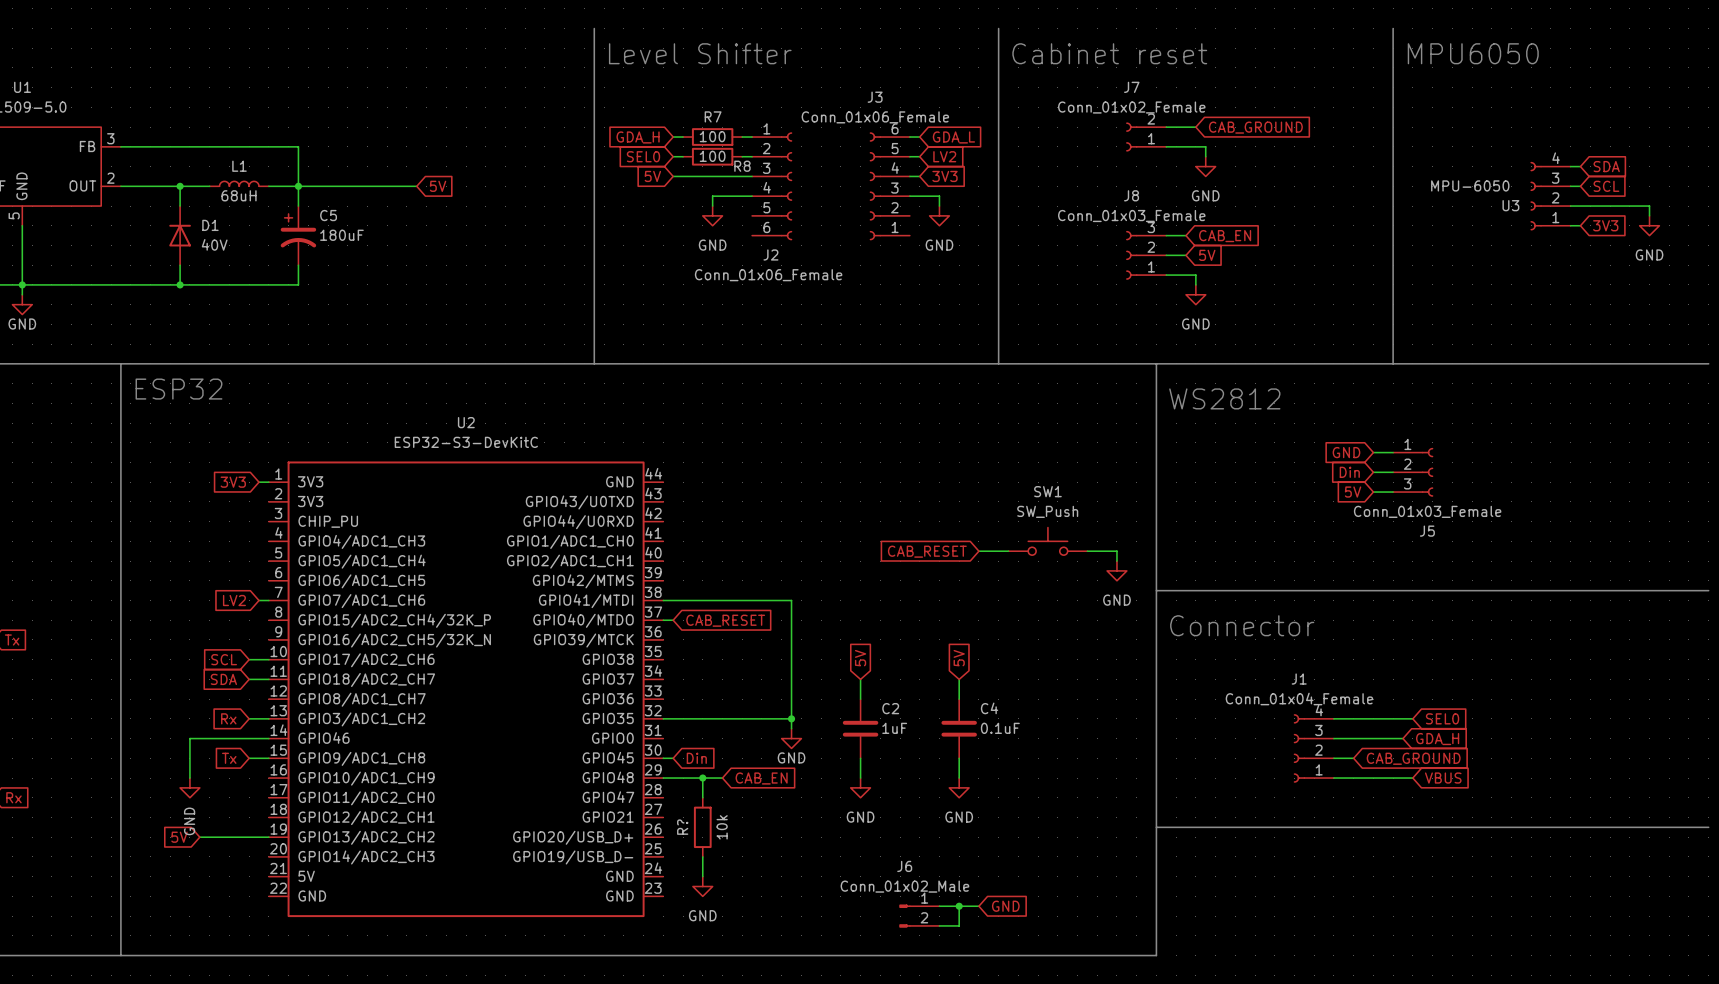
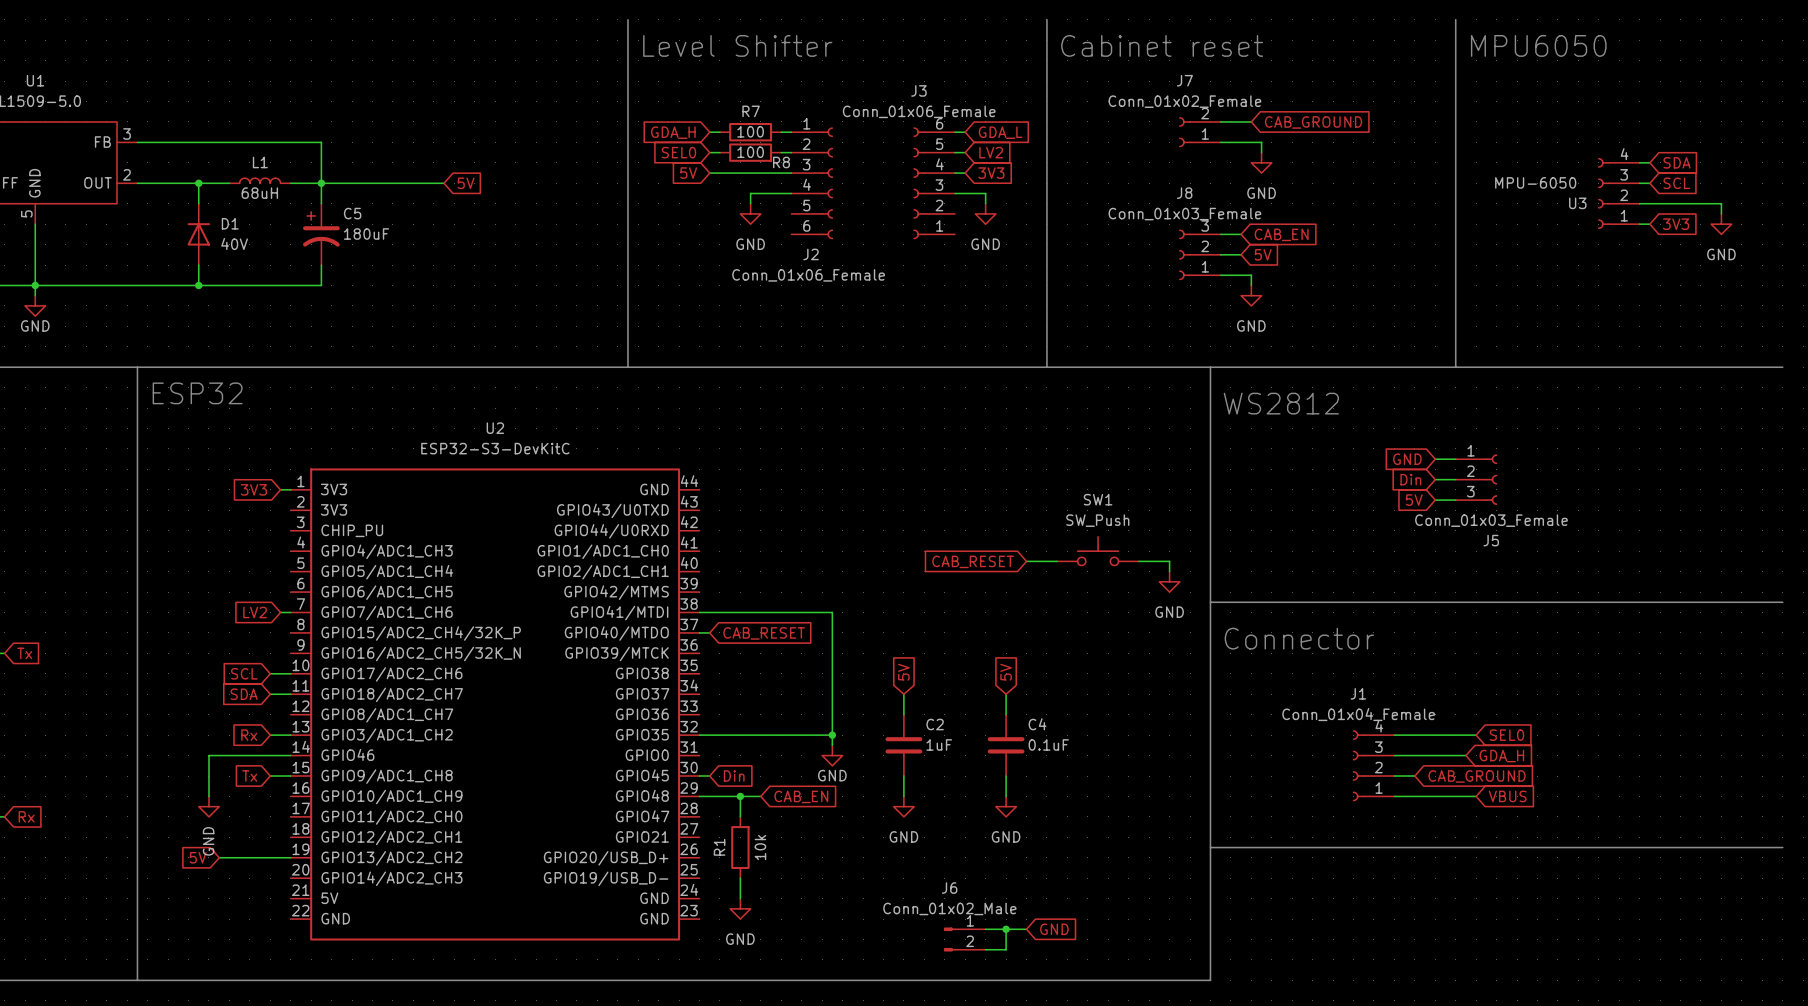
R? name: R? (682, 827) -> R1 (719, 847)

